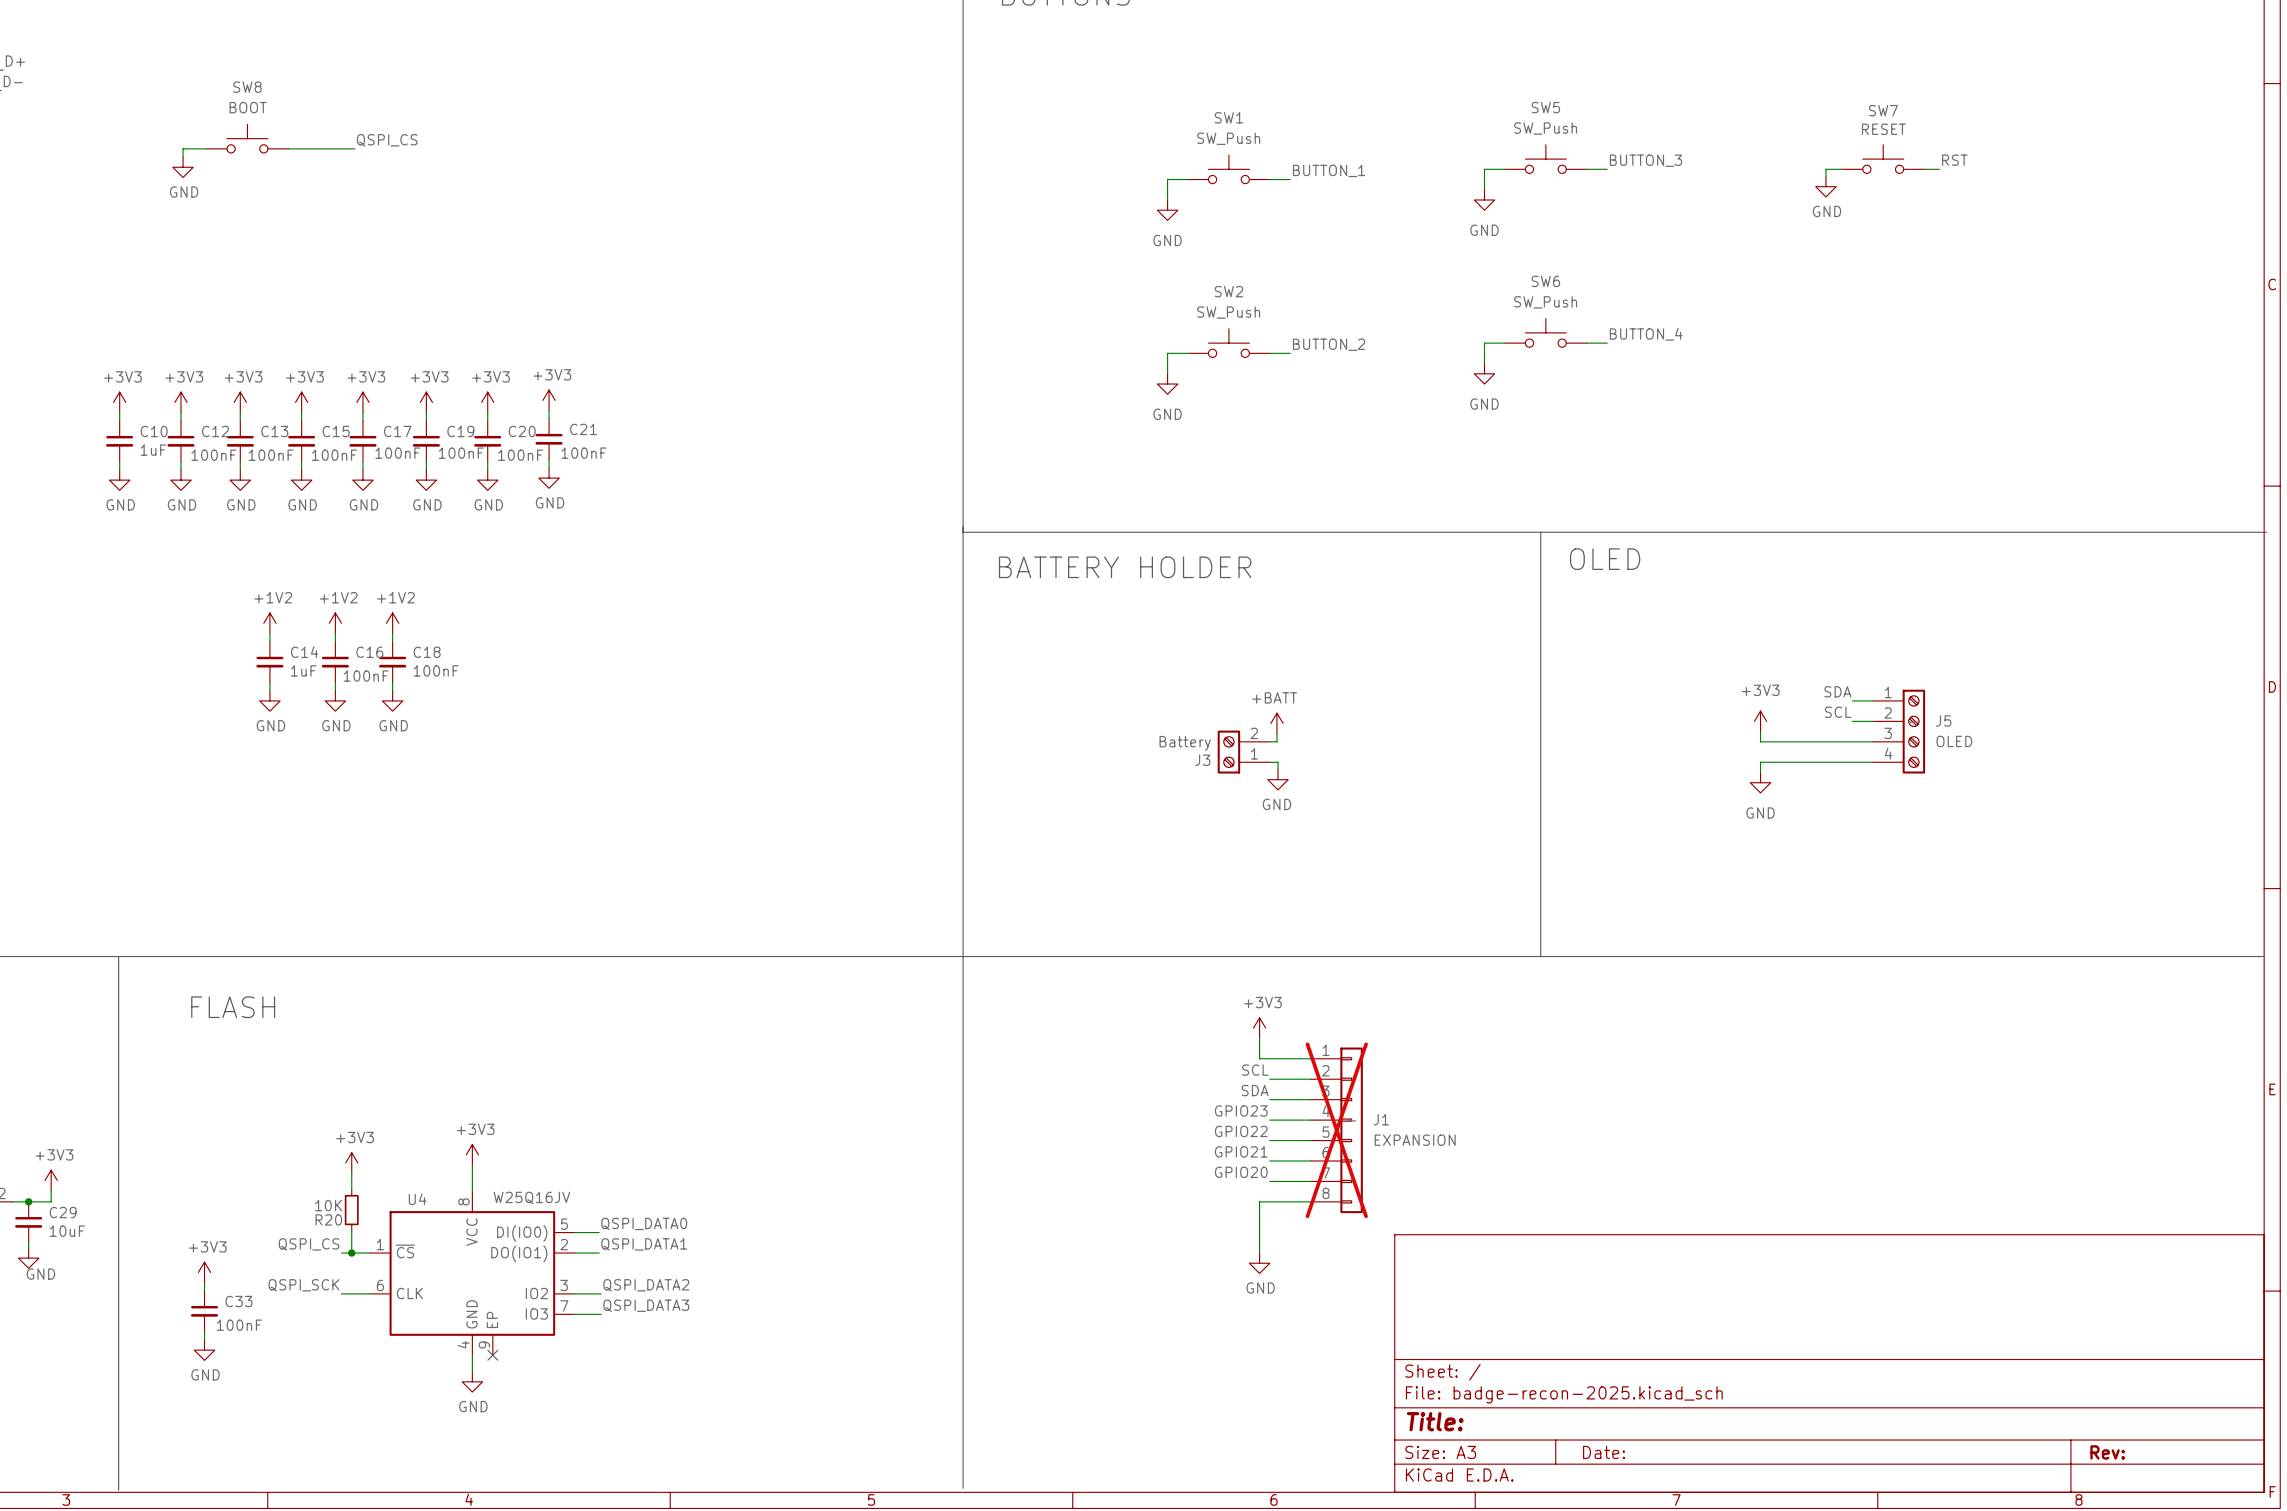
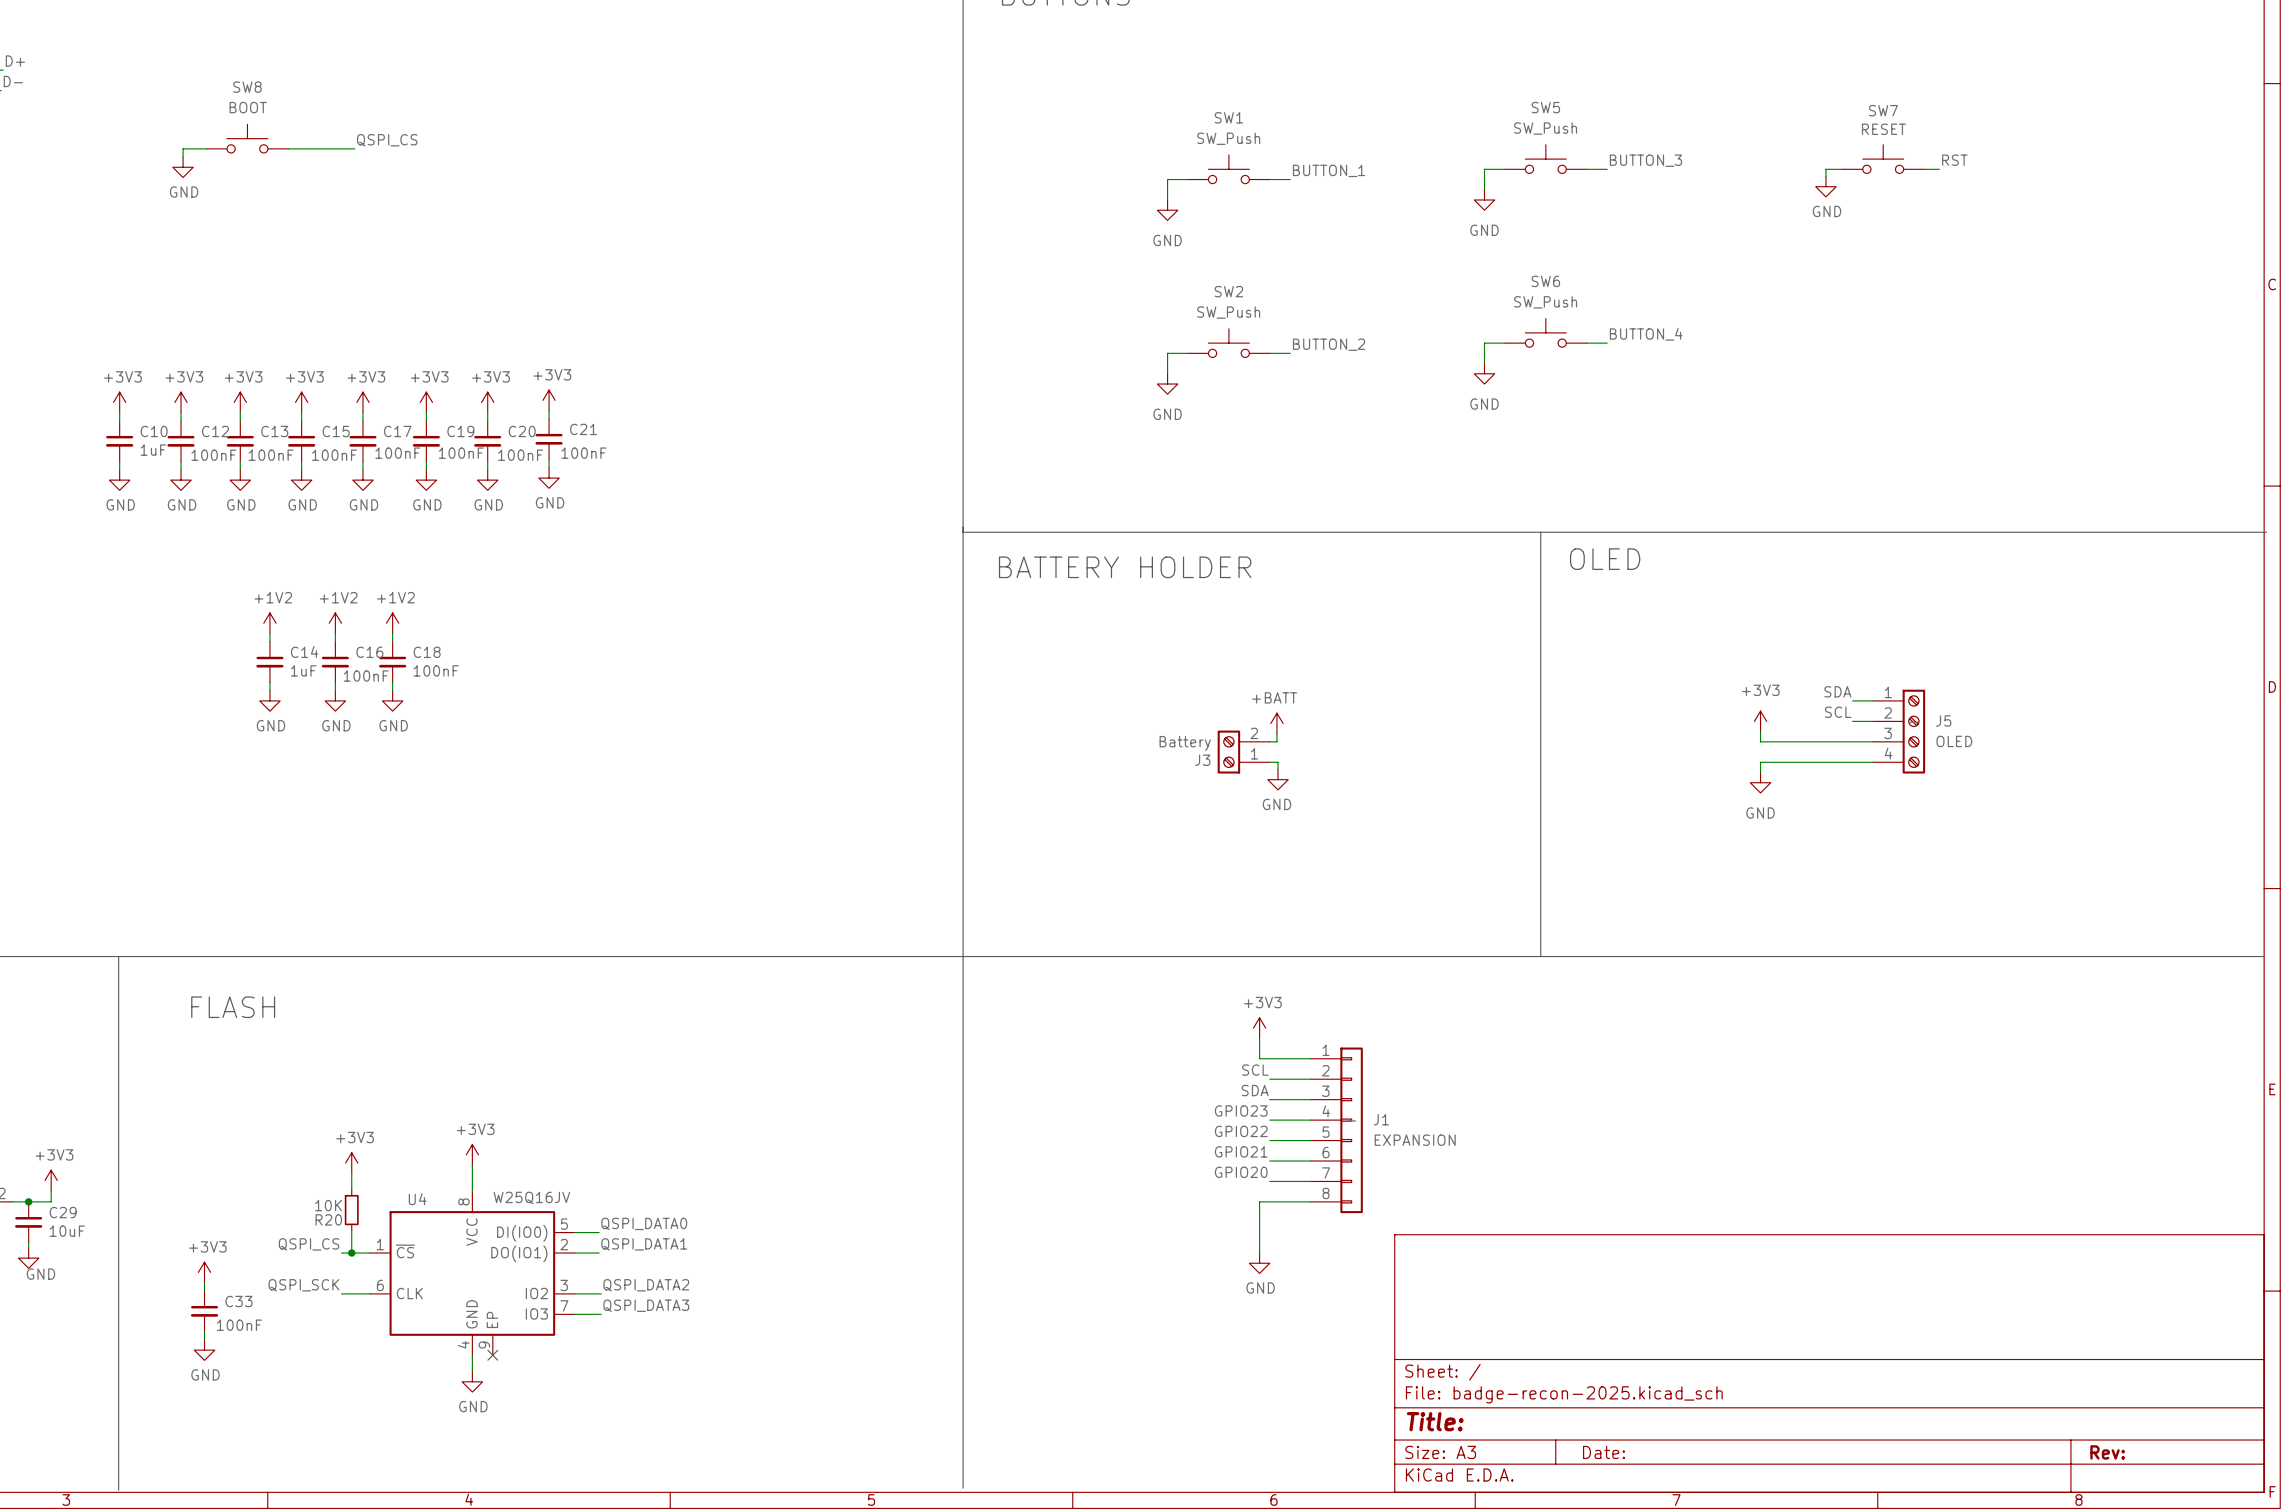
J1 do-not-place cross: (1336, 1130) -> none

